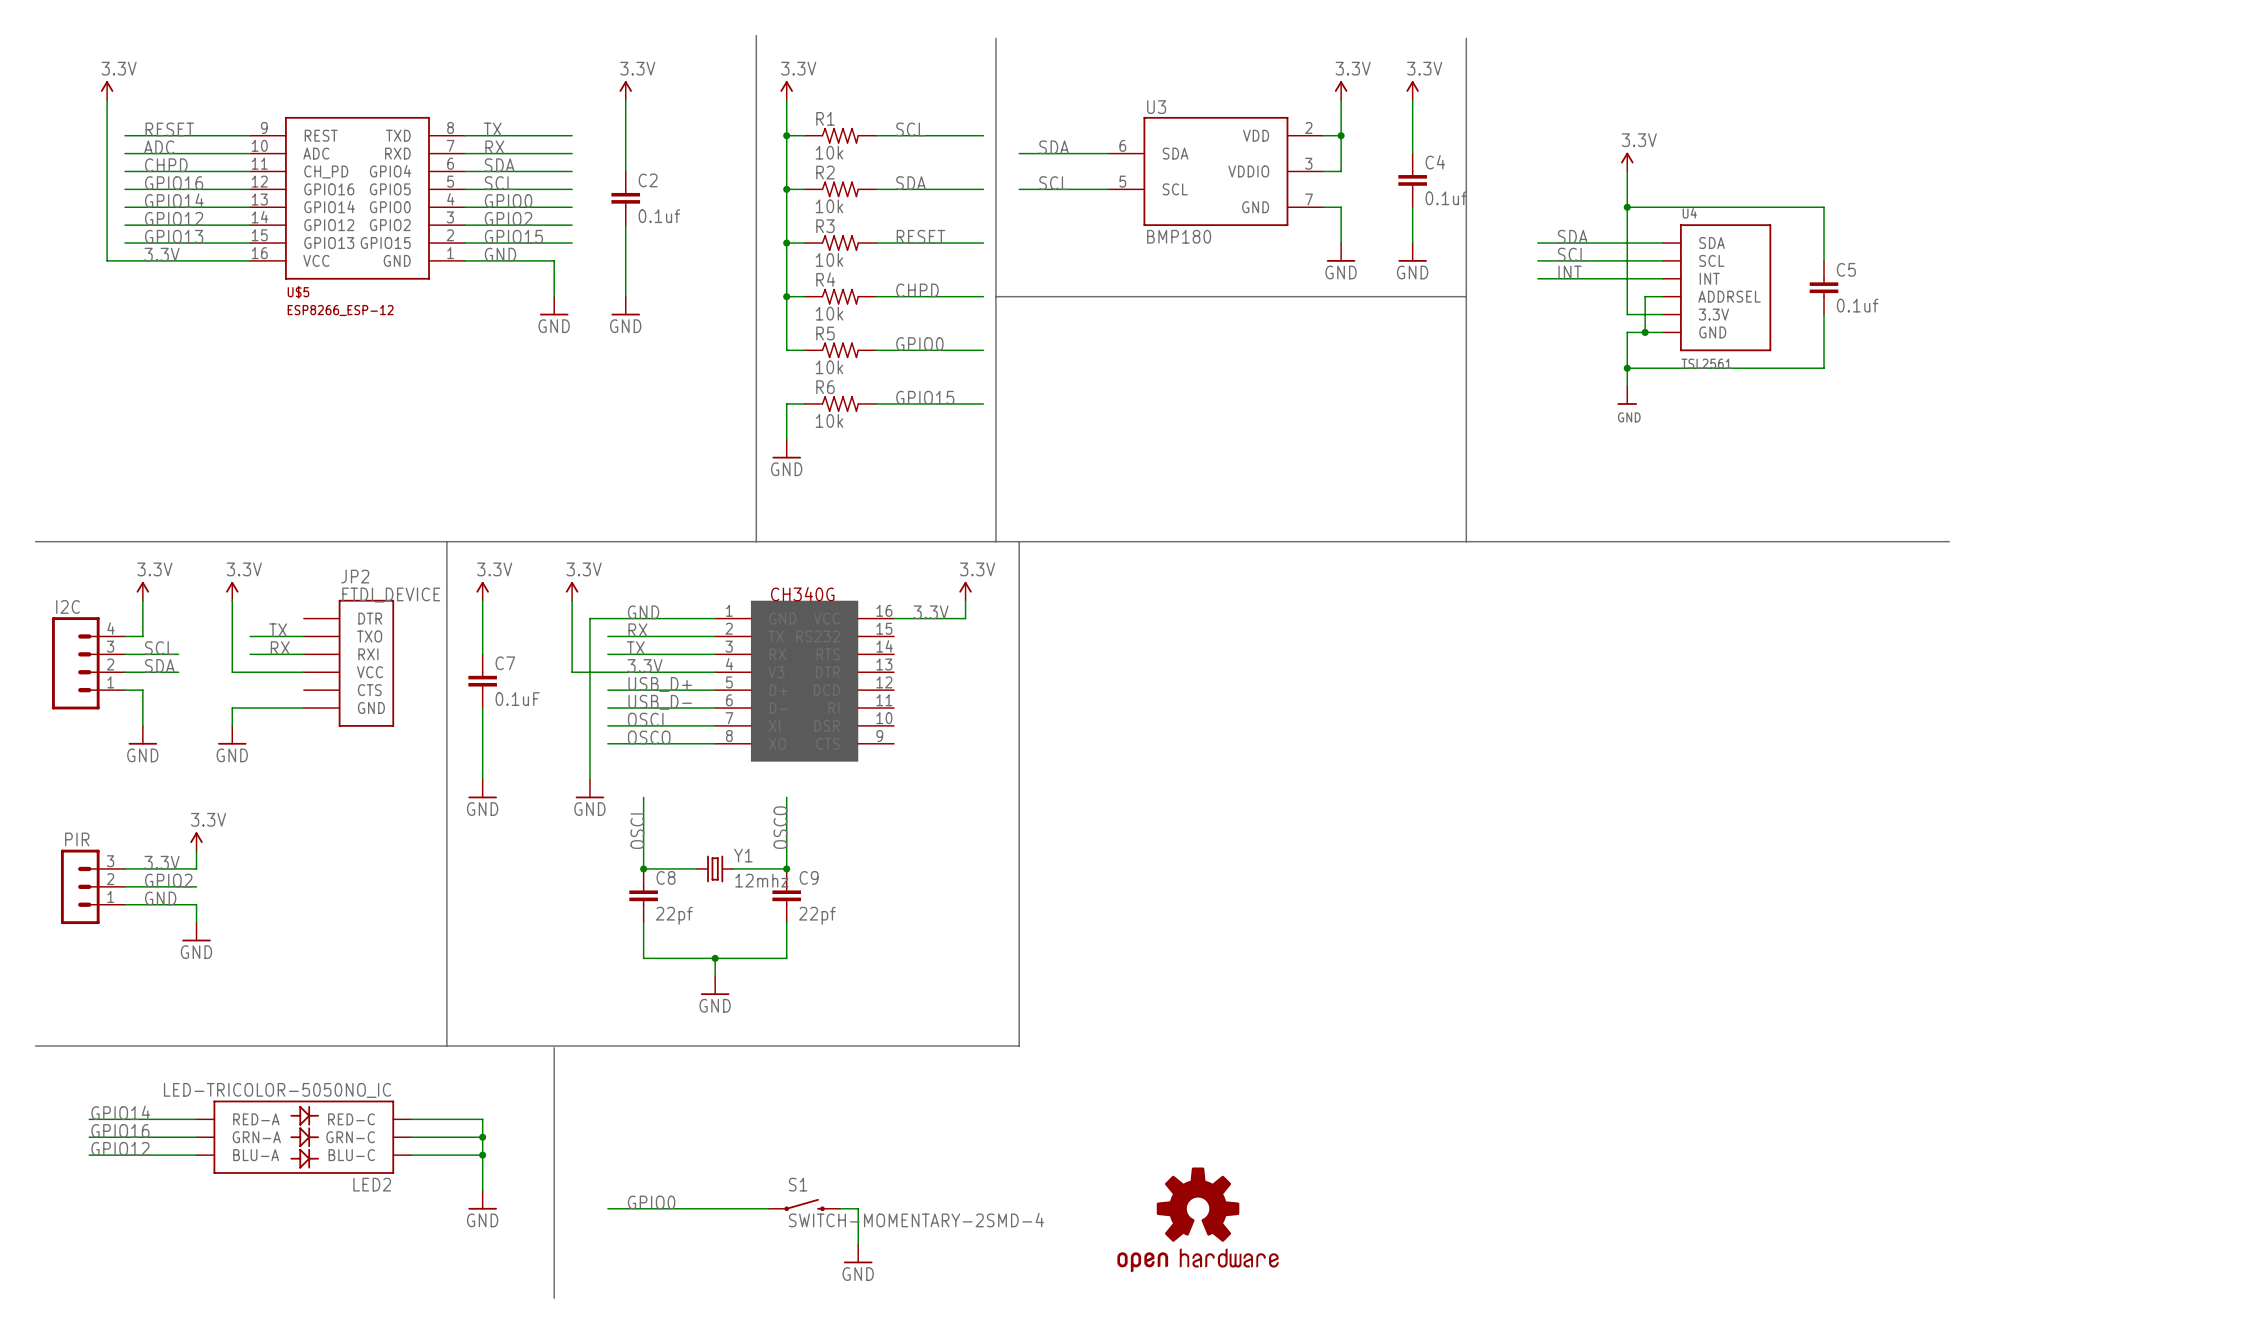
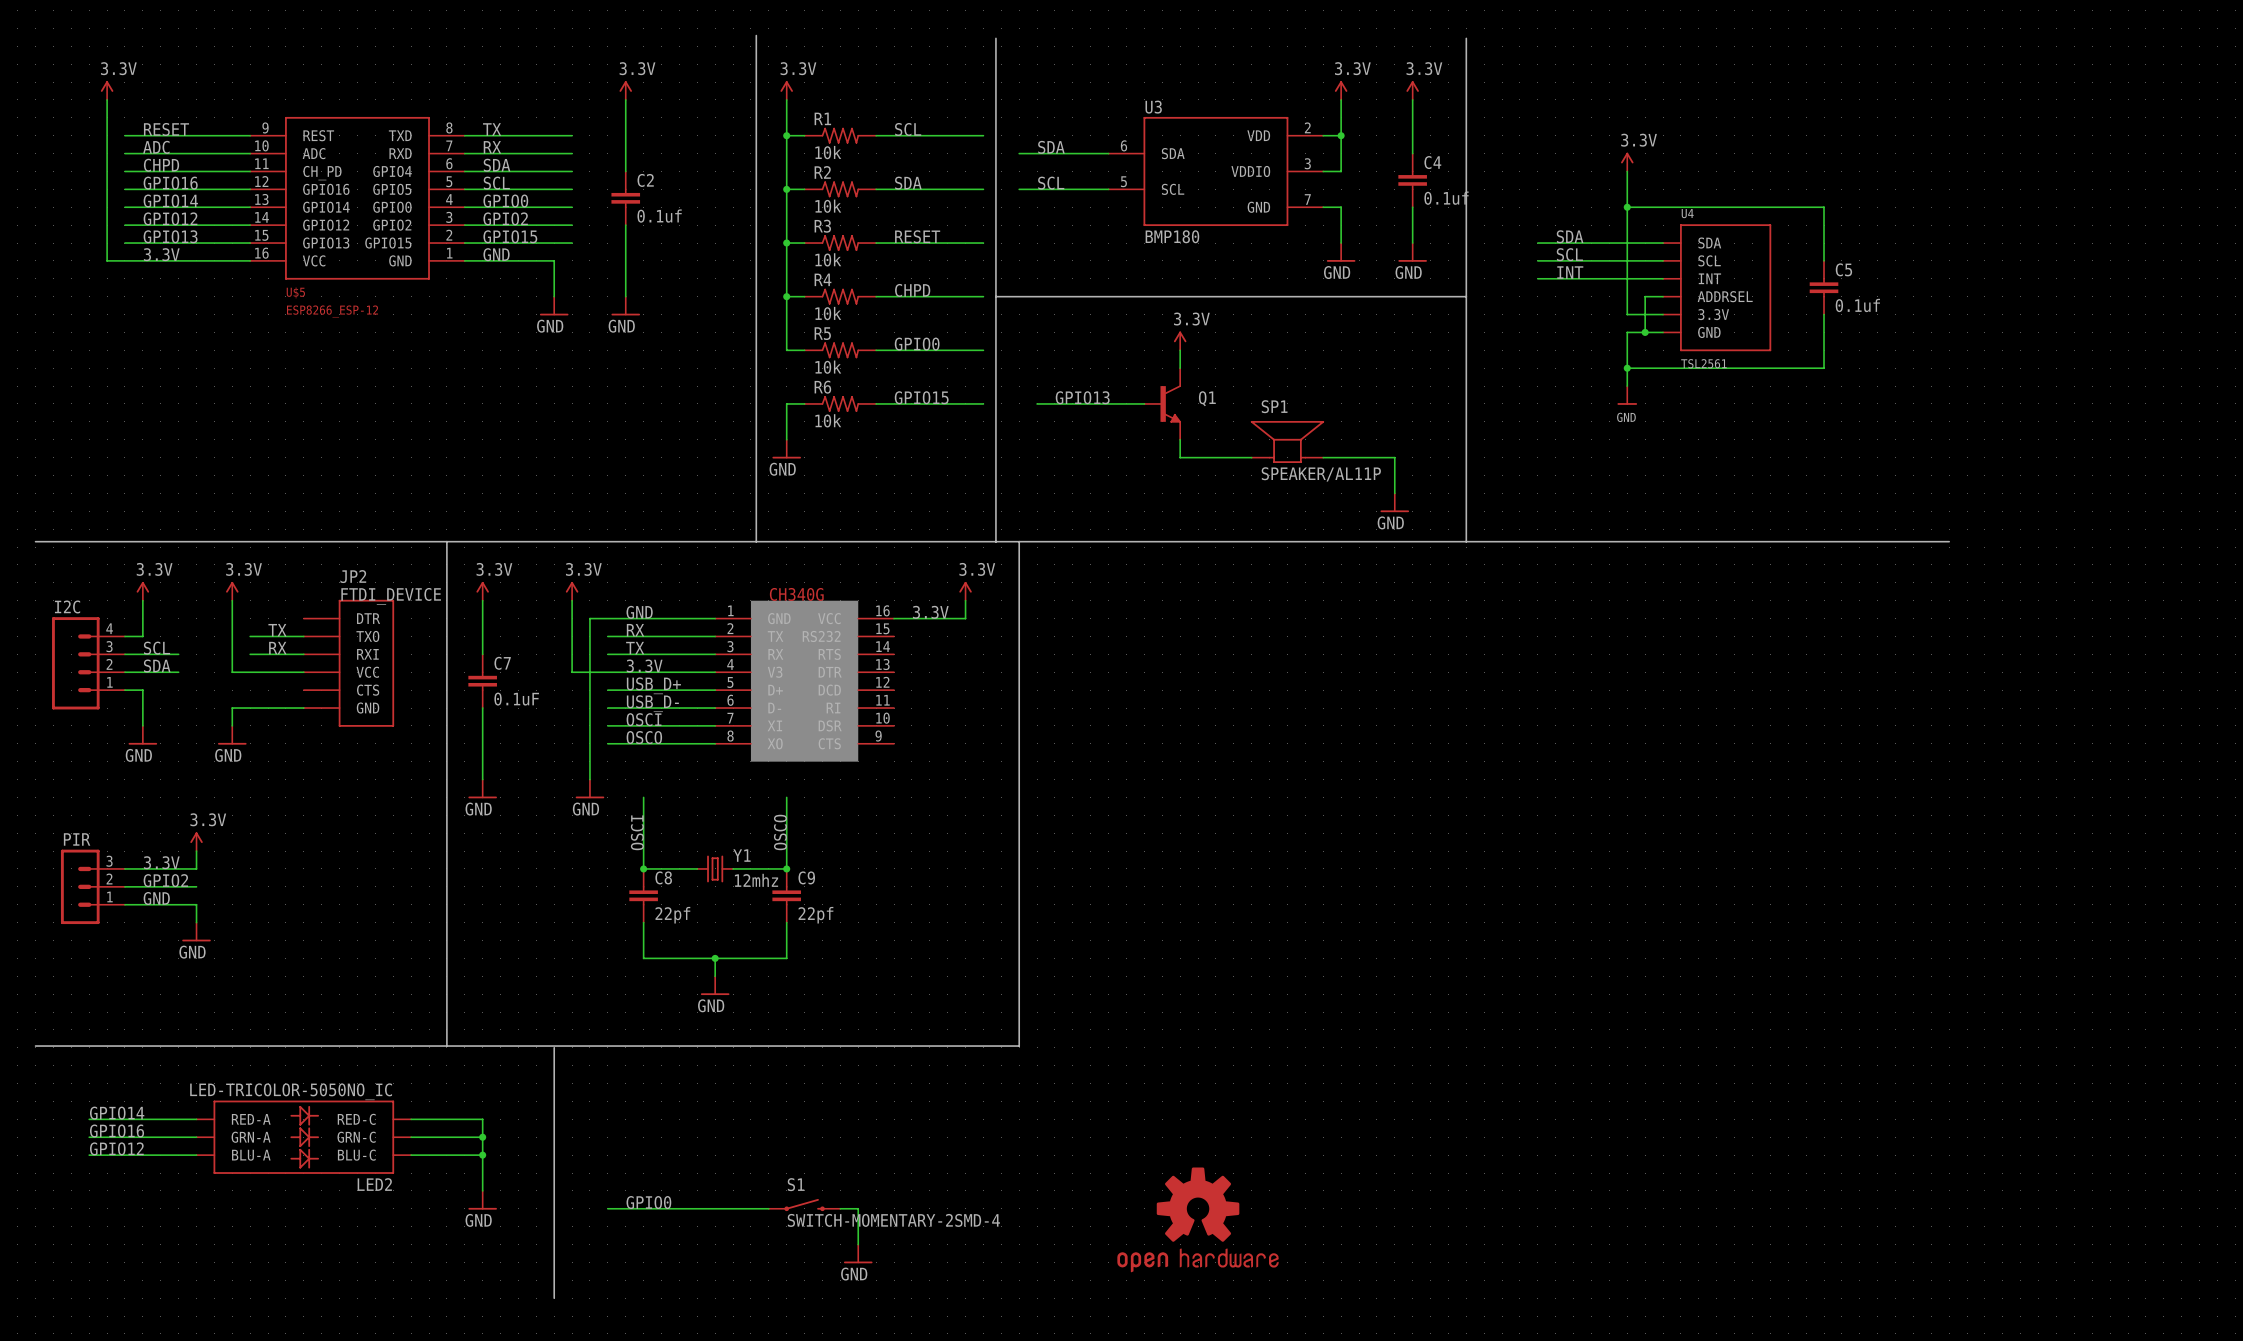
power symbol: none -> 3.3V (1180, 340)
wire: none -> (1180, 350) (1180, 368)
label: none -> GPIO13 (1082, 397)
wire: none -> (1037, 403) (1144, 403)
Q1: none -> (1162, 403)
wire: none -> (1180, 439) (1180, 457) (1251, 457)
SP1: none -> SPEAKER/AL11P (1287, 441)
wire: none -> (1323, 457) (1394, 457) (1394, 493)
power symbol: none -> GND (1394, 502)

